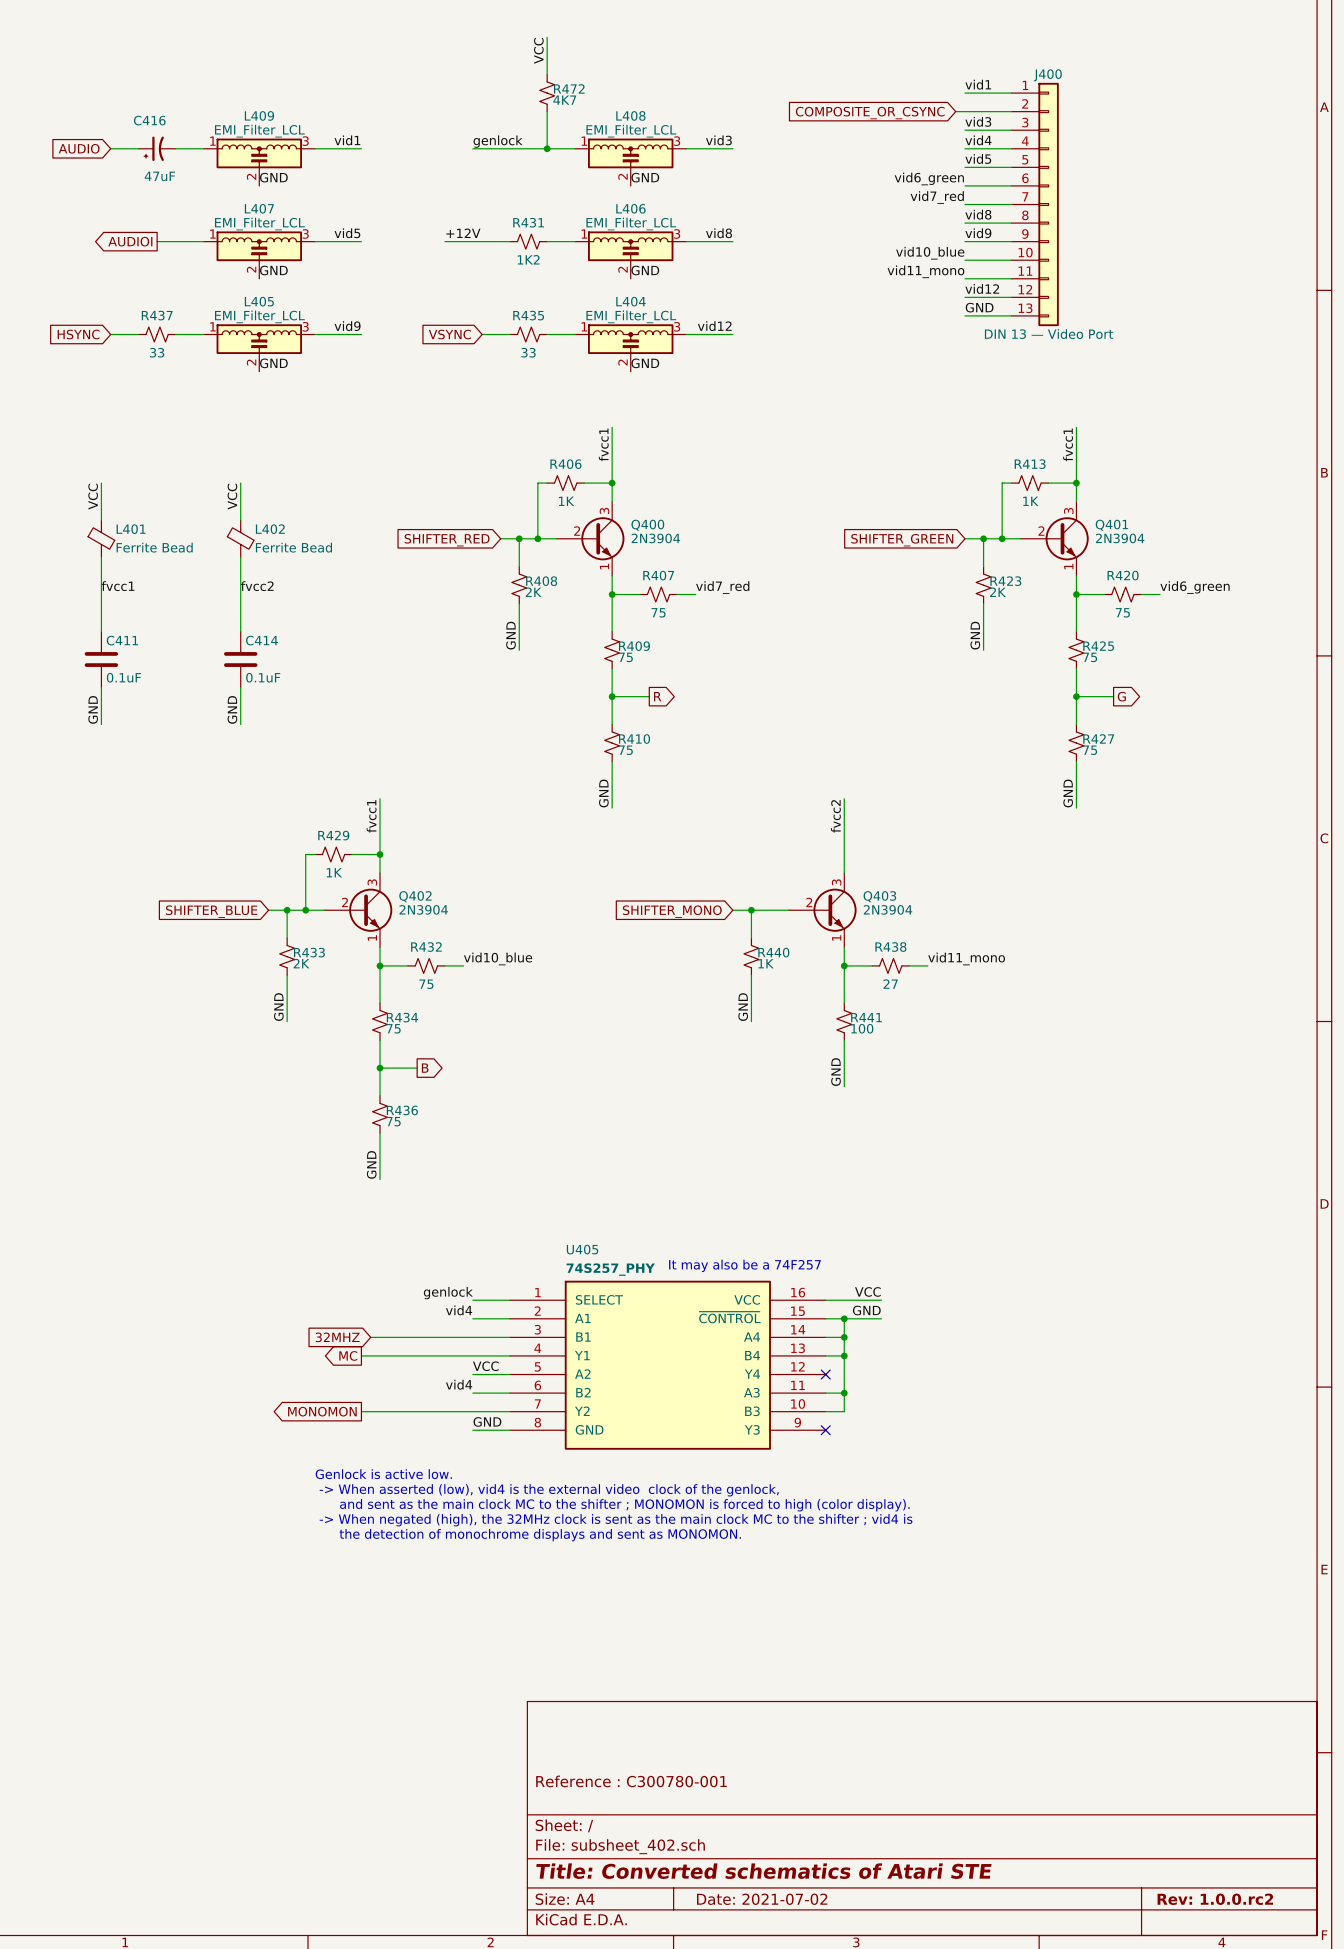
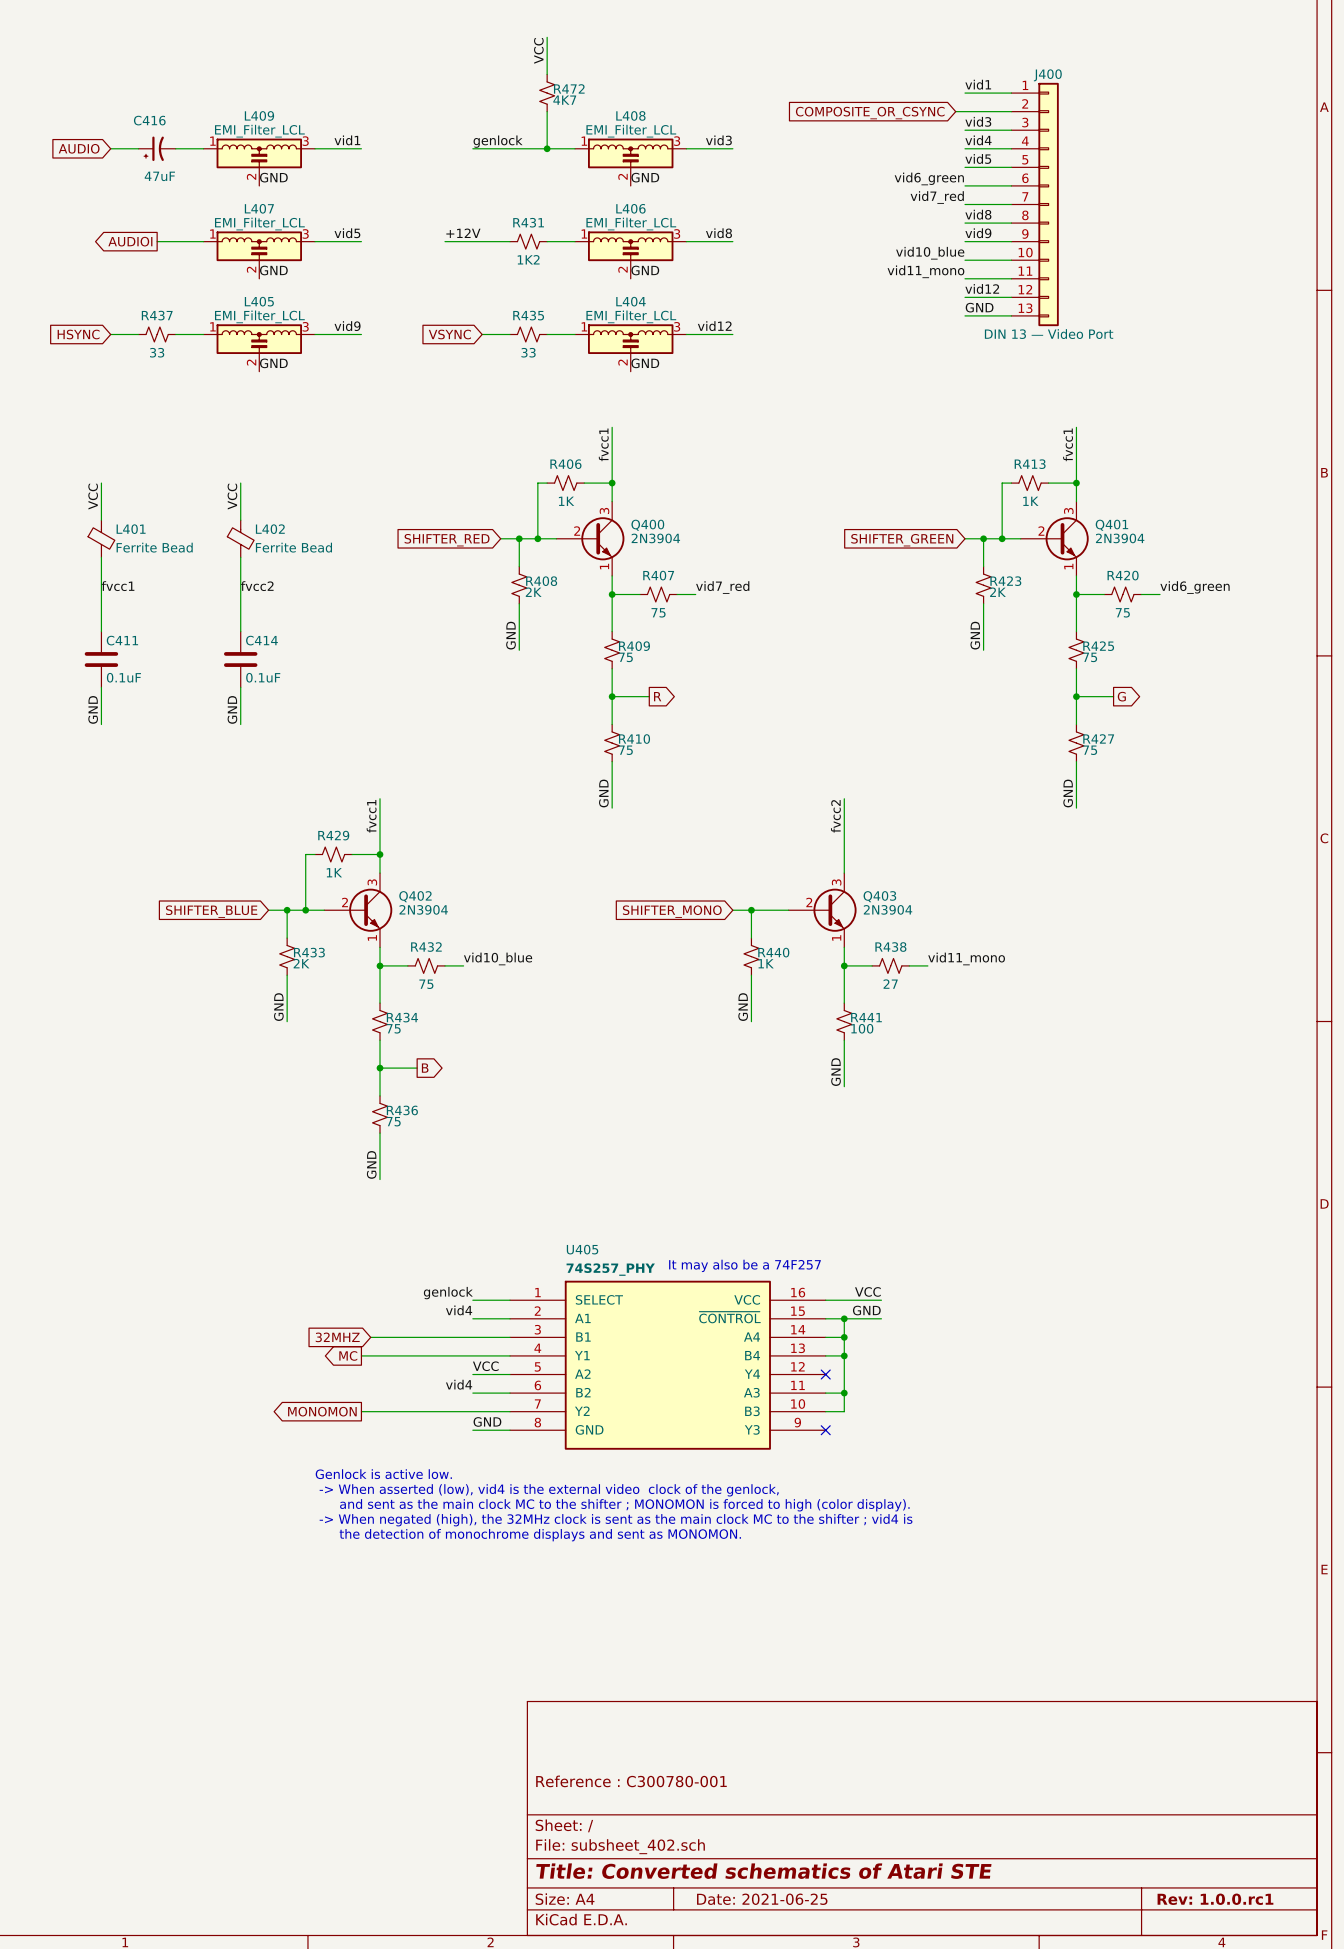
title block: Date: 2021-07-02 (762, 1899) -> Date: 2021-06-25 (762, 1899)
title block: Rev: 1.0.0.rc2 (1215, 1899) -> Rev: 1.0.0.rc1 (1215, 1899)

